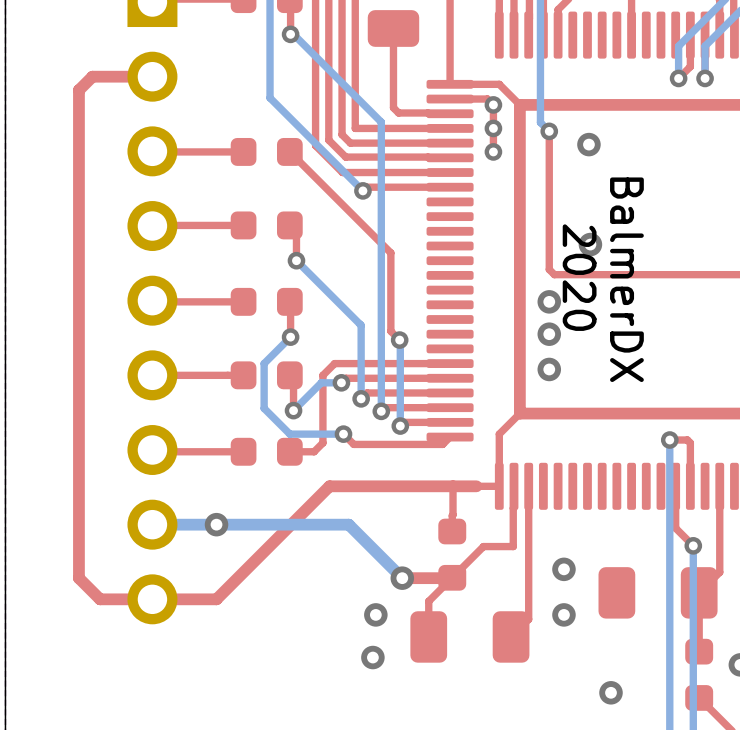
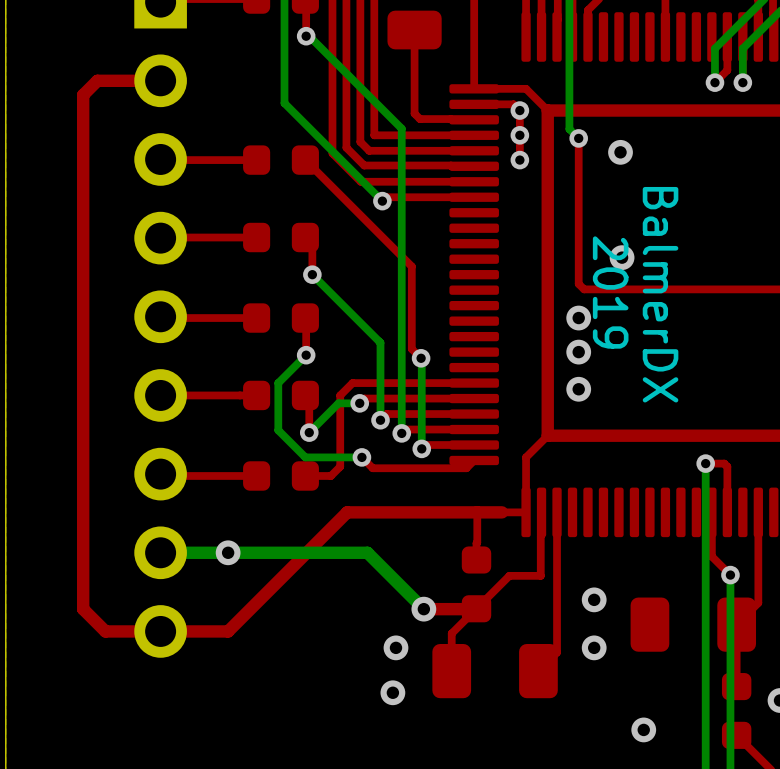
text: 2020 (579, 277) -> 2019 (610, 292)

